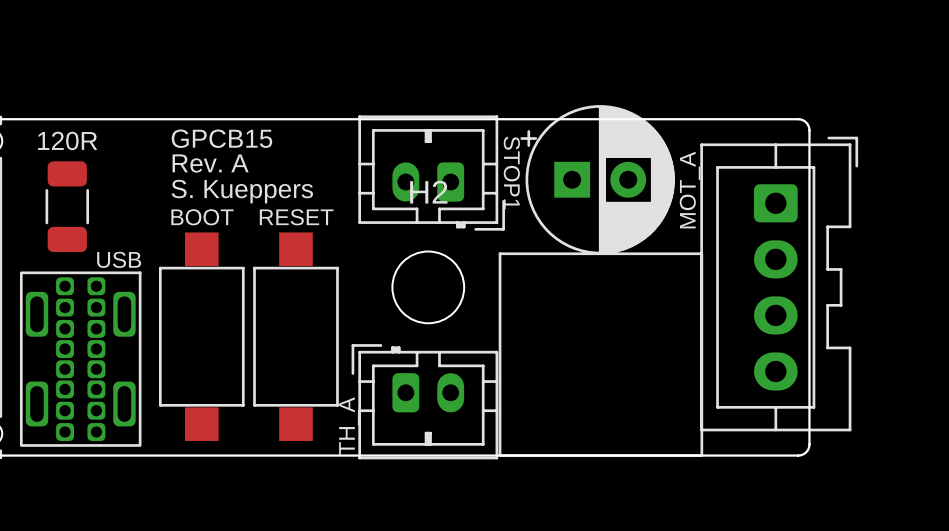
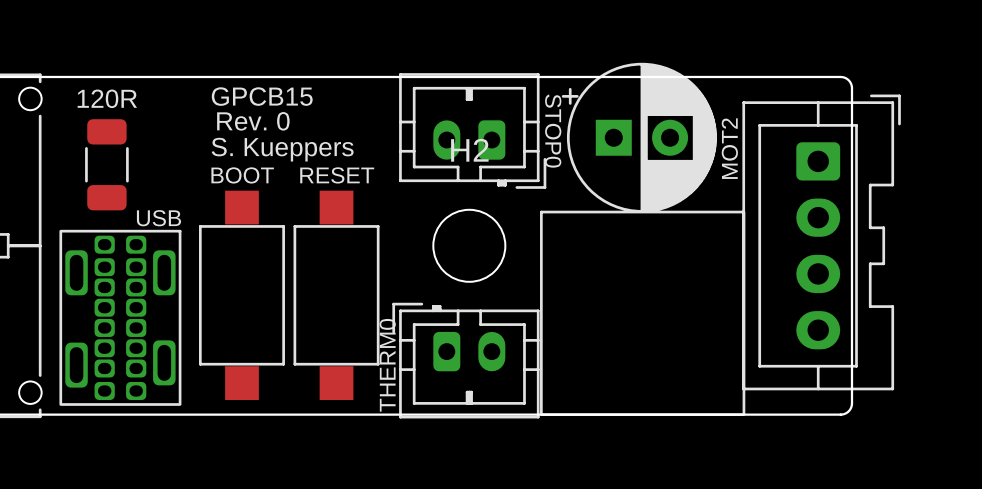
text: Rev. A (210, 163) -> Rev. 0 (253, 121)
text: STOP1 (511, 172) -> STOP0 (553, 131)
text: MOT_A (689, 190) -> MOT2 (729, 148)
part footprint: [19, 271, 142, 447] -> [59, 229, 182, 406]
text: TH_A (349, 426) -> THERM0 (387, 365)

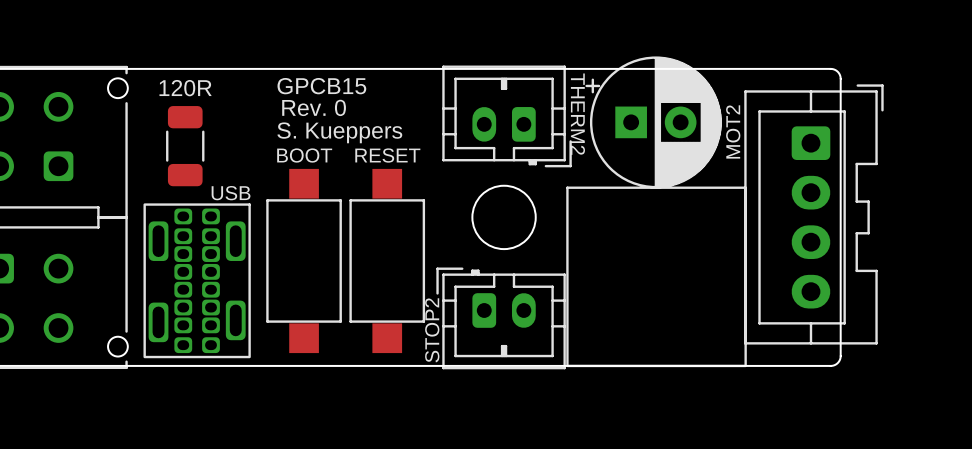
text: STOP0 (553, 131) -> THERM2 (577, 114)
H2 name: H2 (469, 150) -> none
text: THERM0 (387, 365) -> STOP2 (432, 330)

